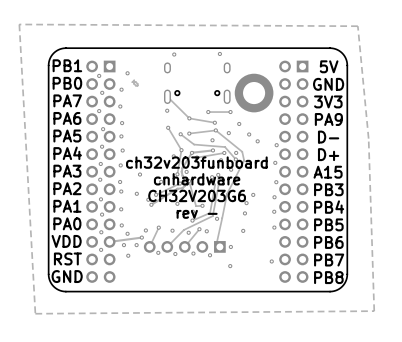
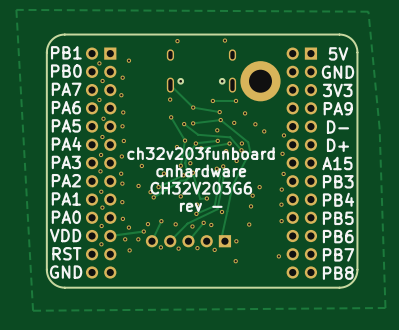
track: (134, 80) (134, 83) (137, 85) (135, 82) (132, 82) (134, 80) -> none

